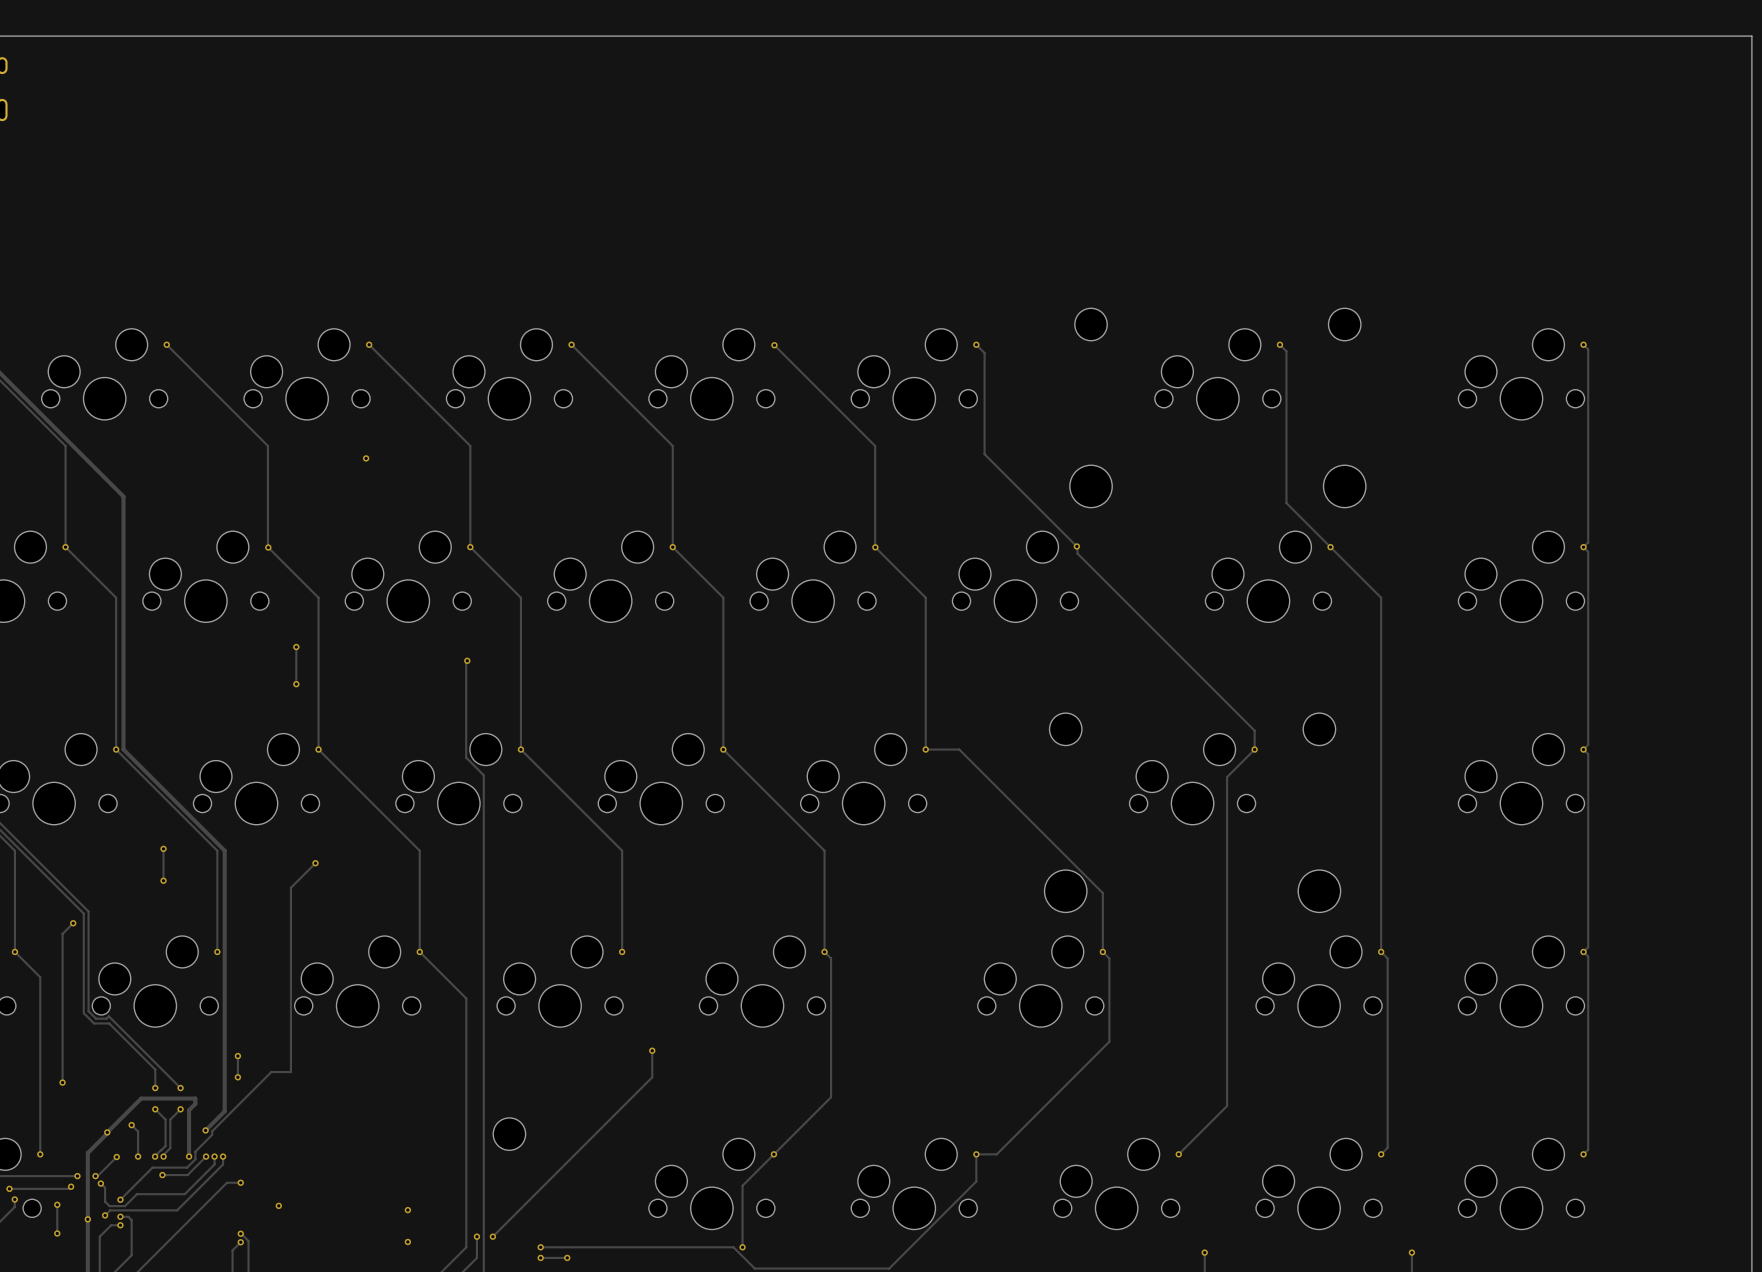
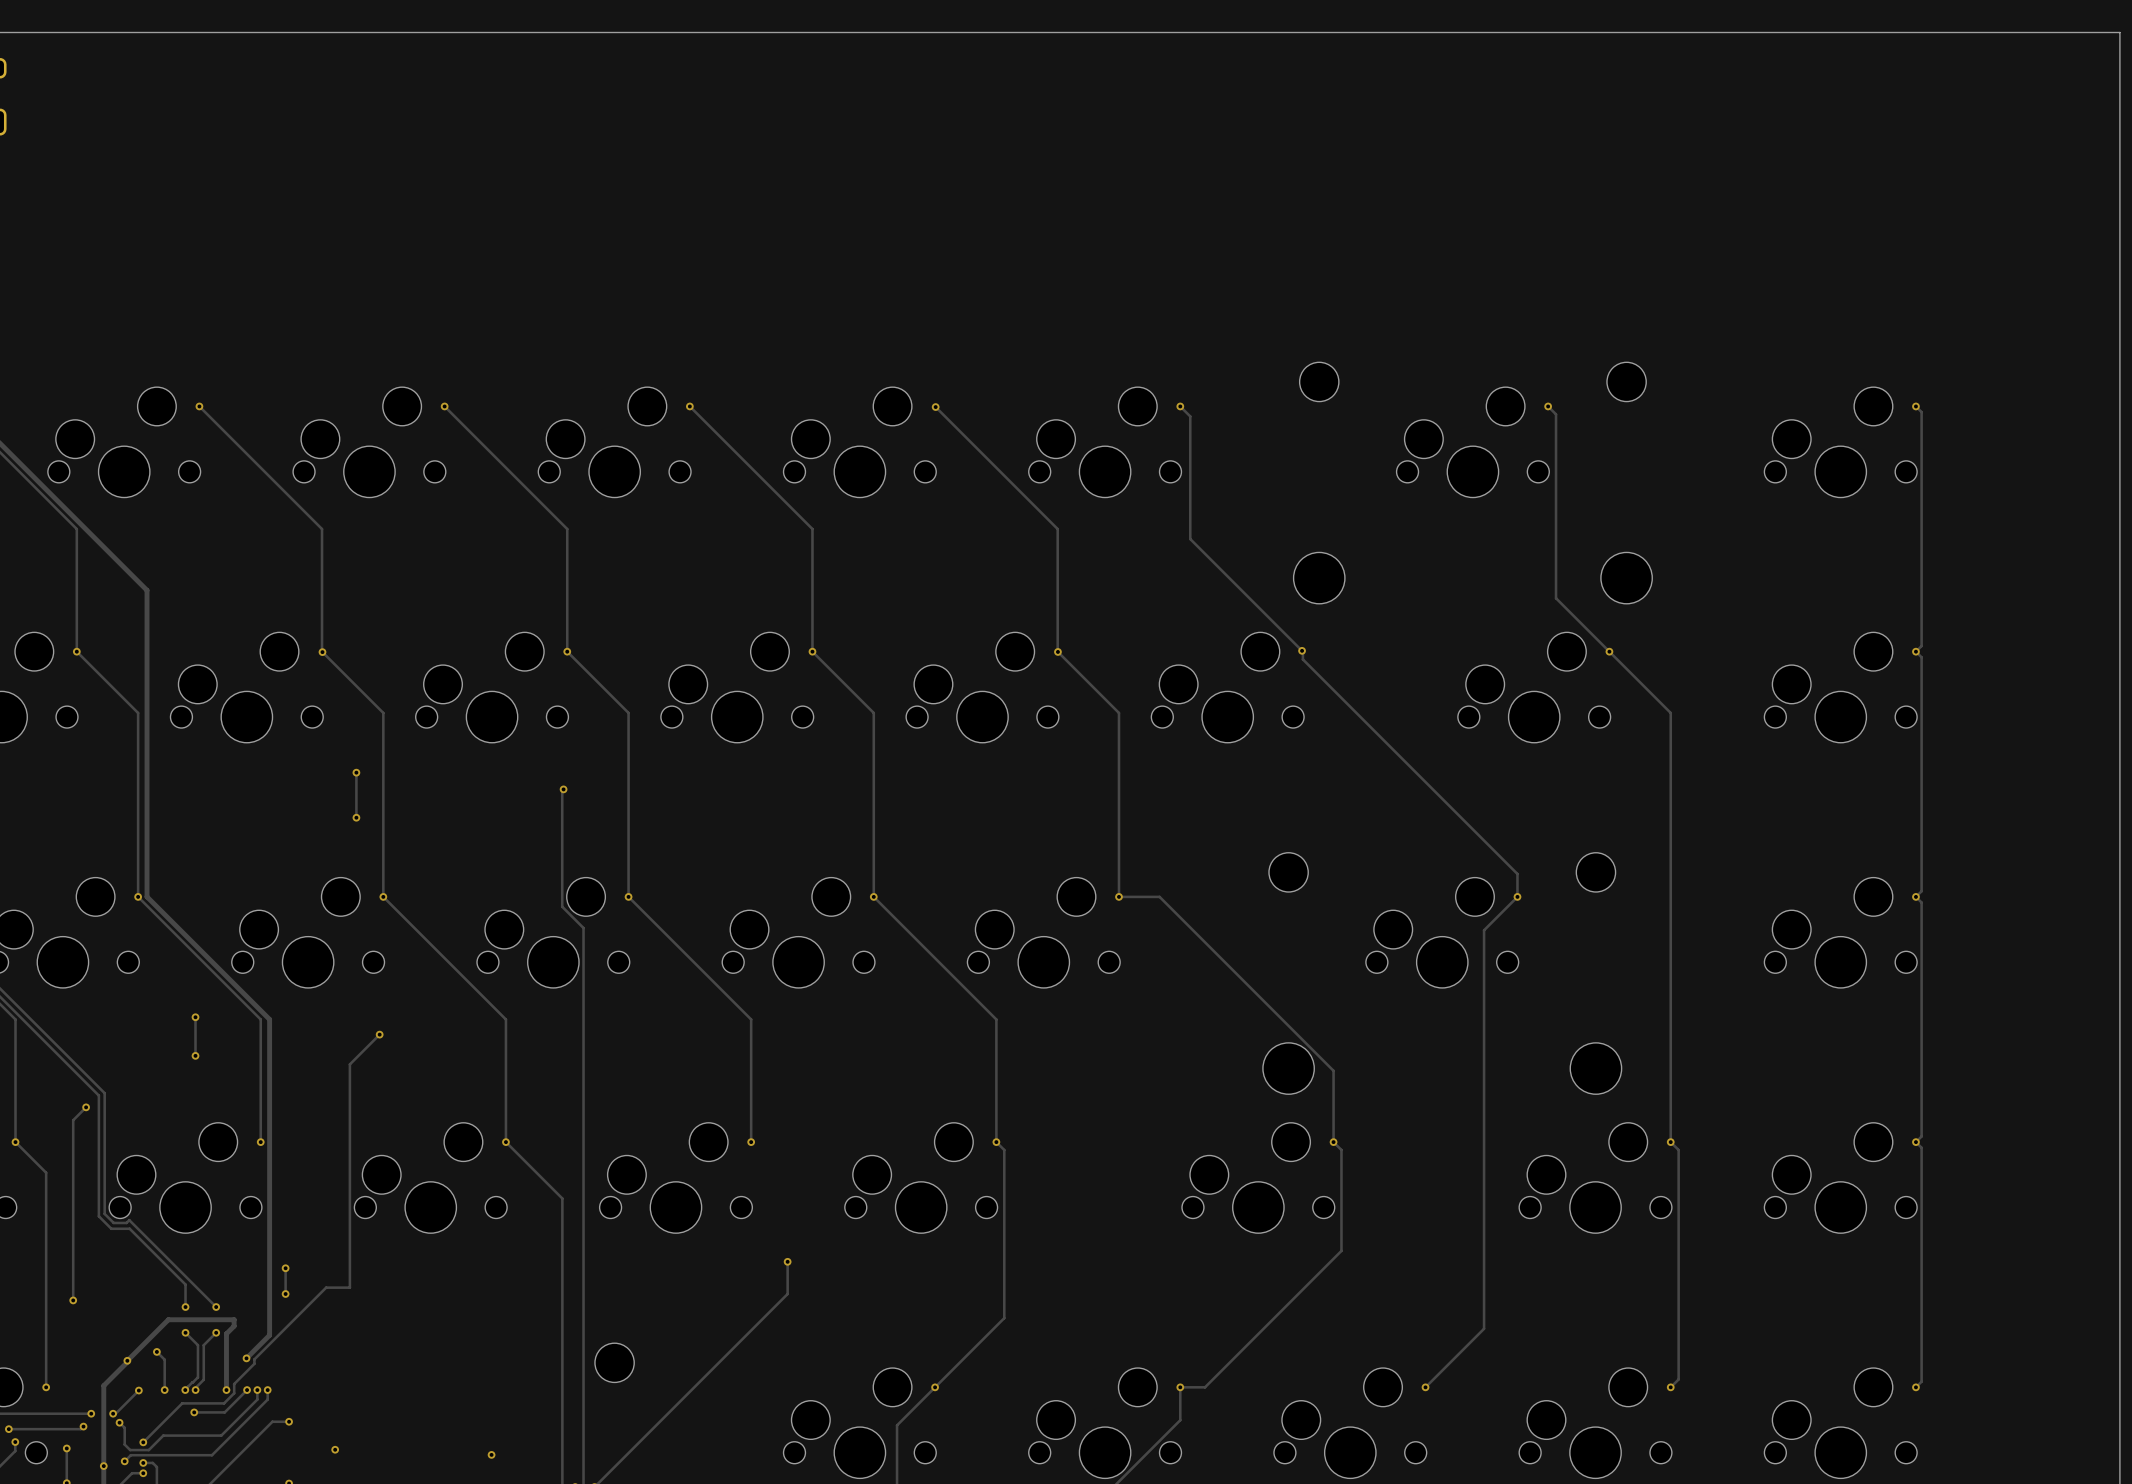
via: (366, 458) -> none

